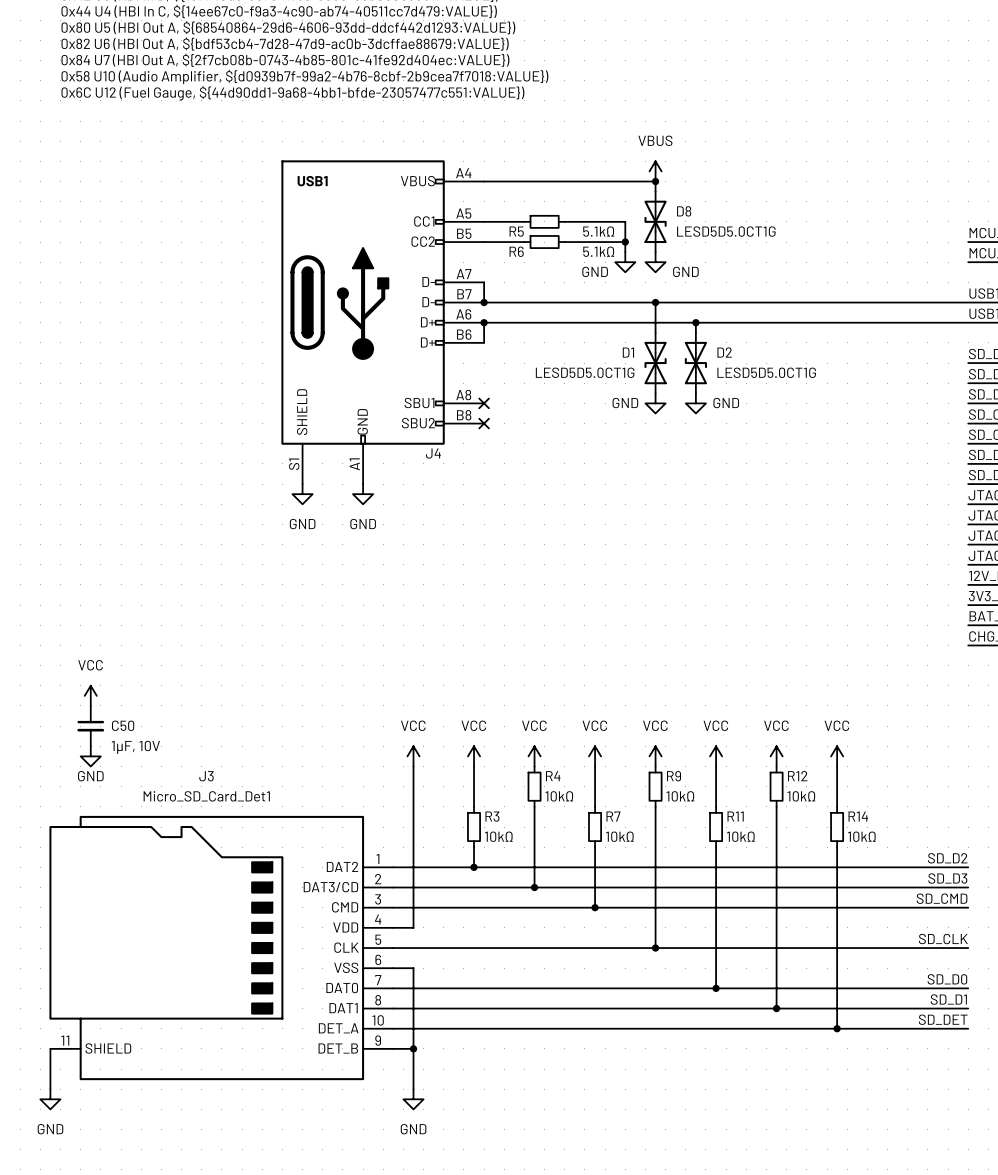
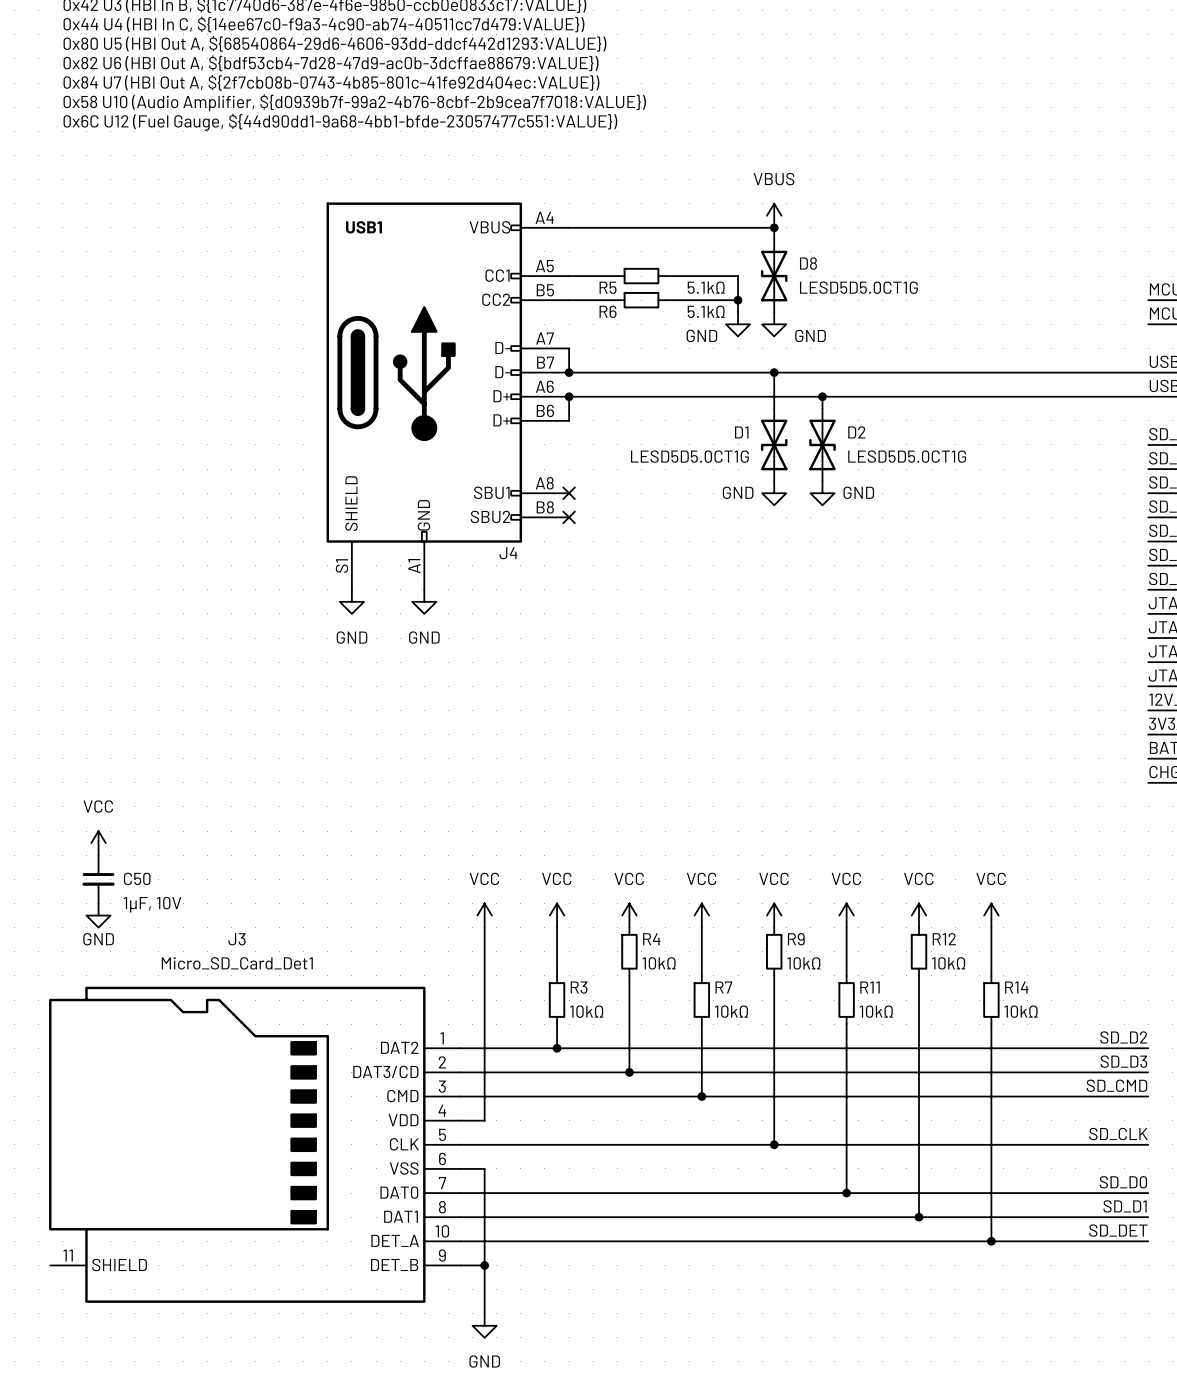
wire: (50, 1048) (50, 1089) -> none
power symbol: GND (50, 1099) -> none

